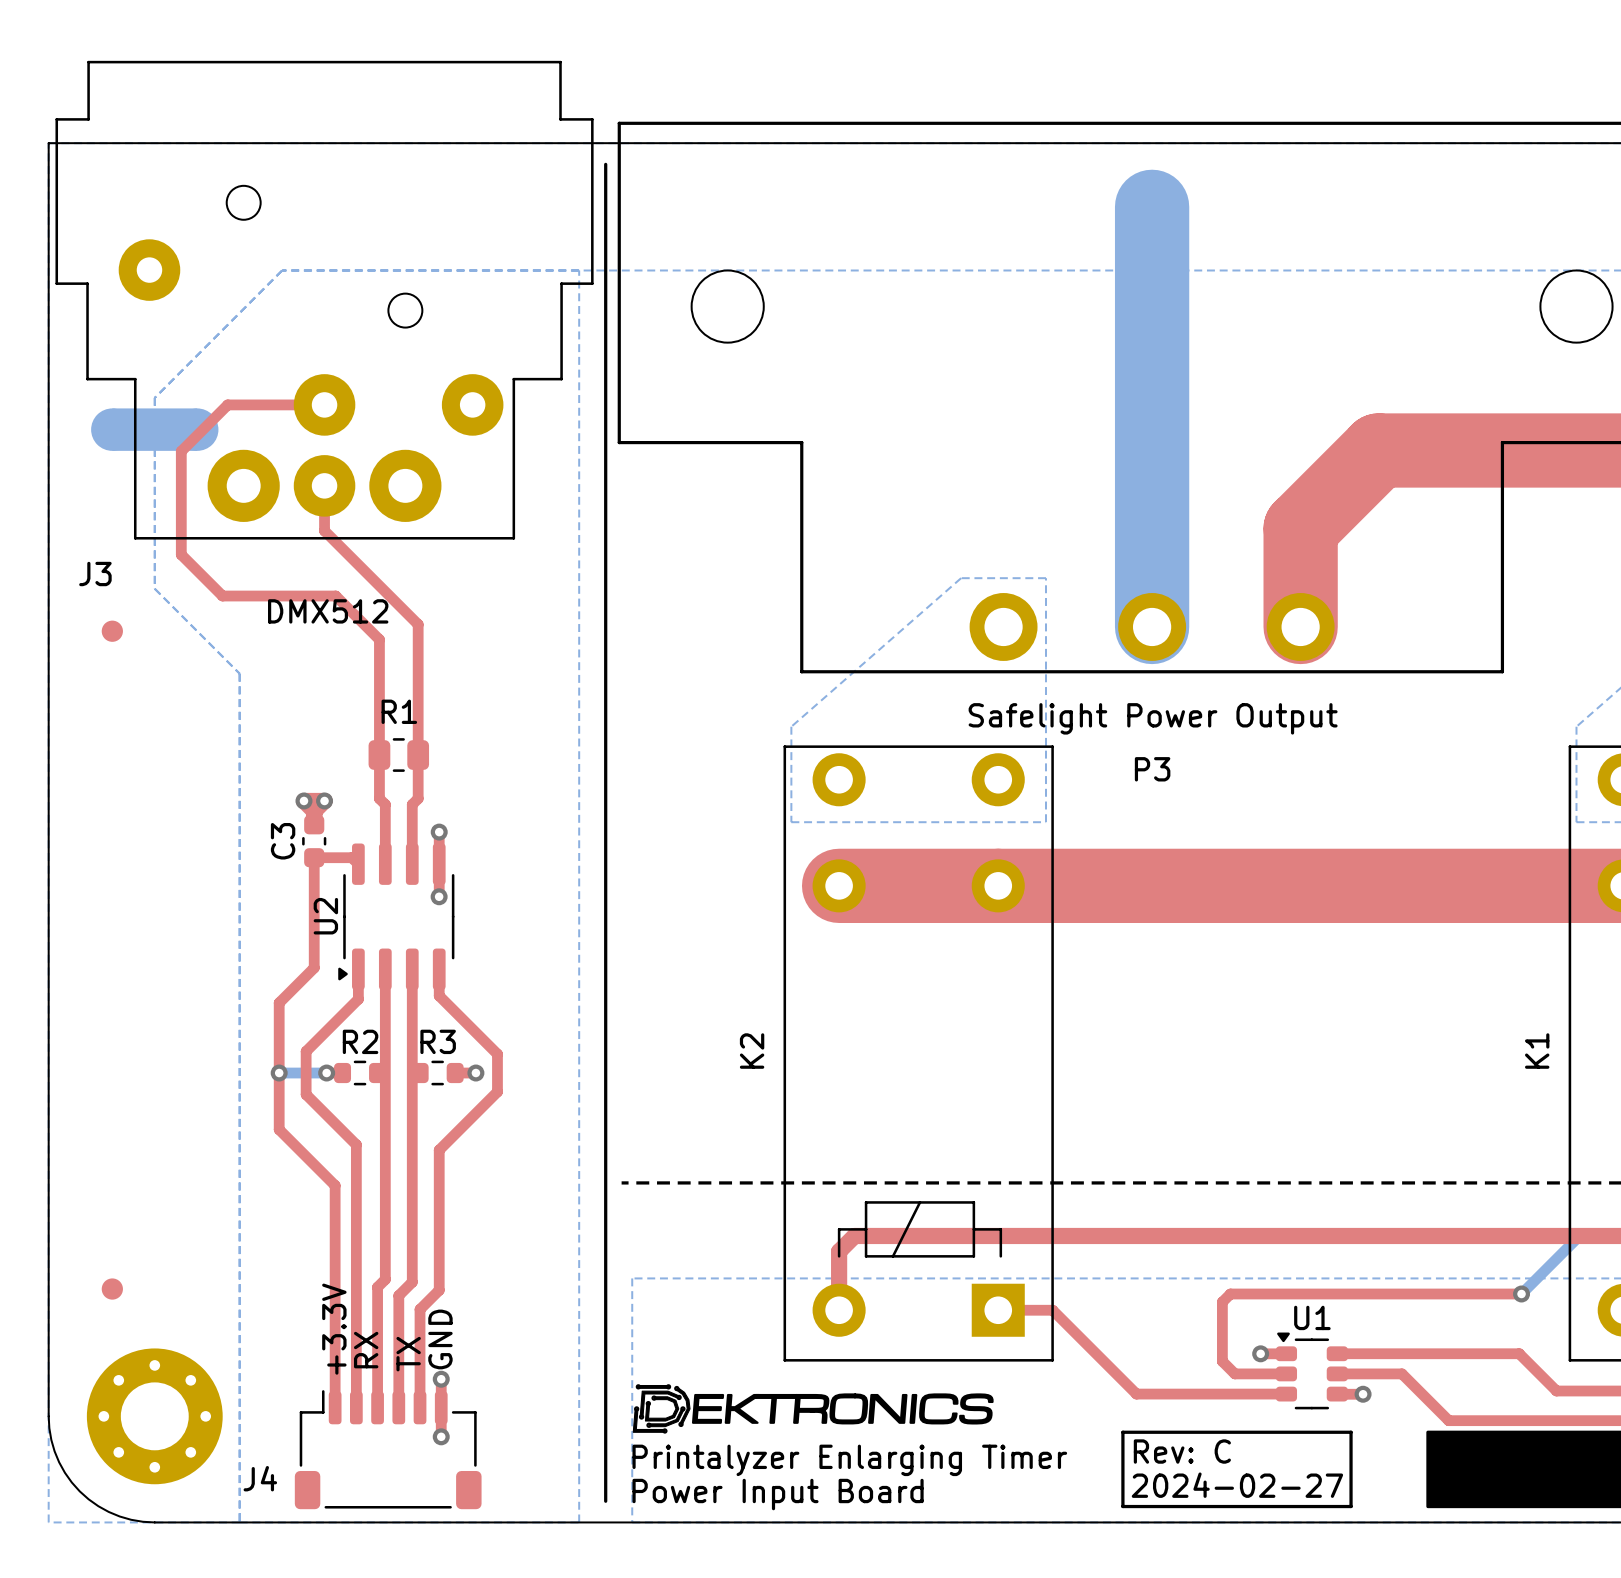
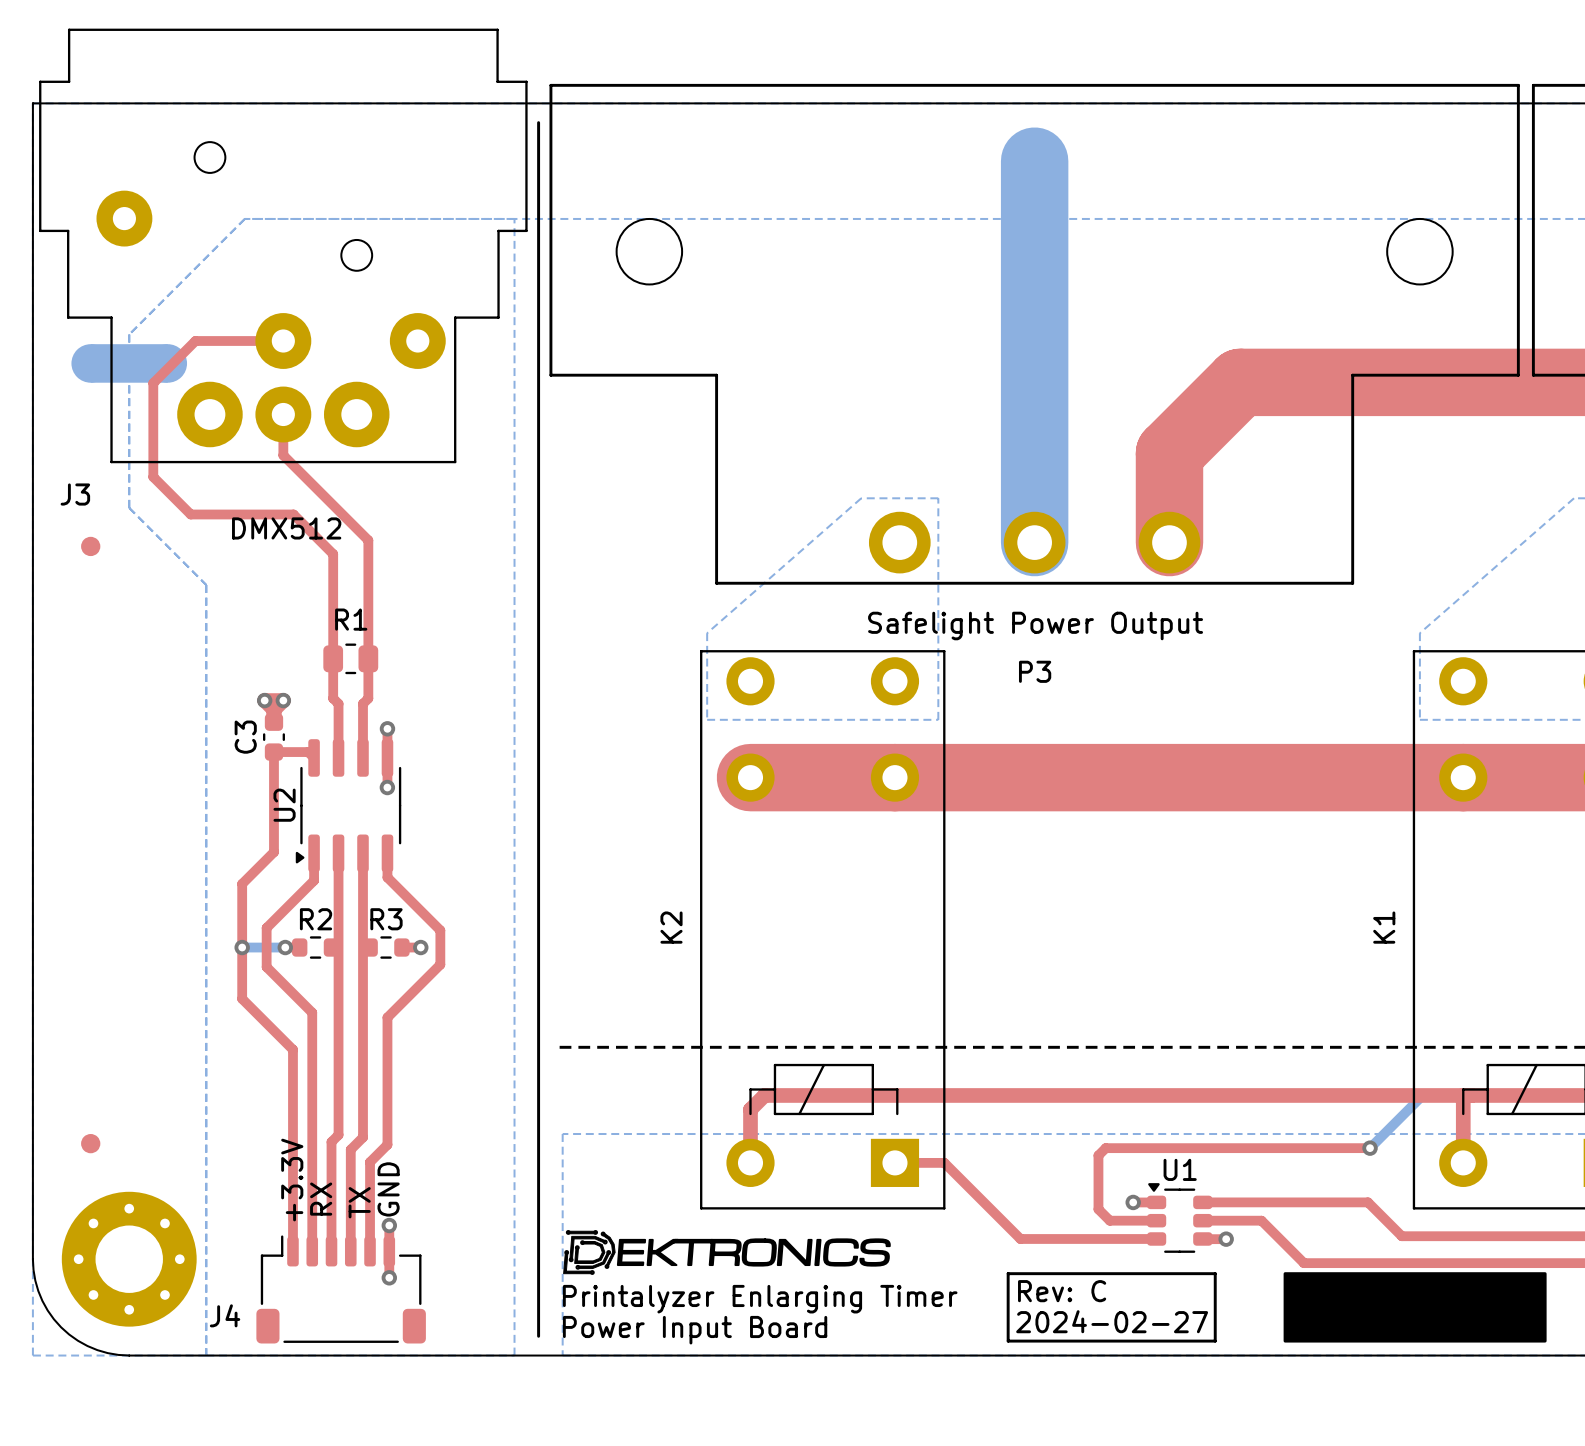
part footprint: [86, 1348, 223, 1485] -> [61, 1191, 197, 1327]

